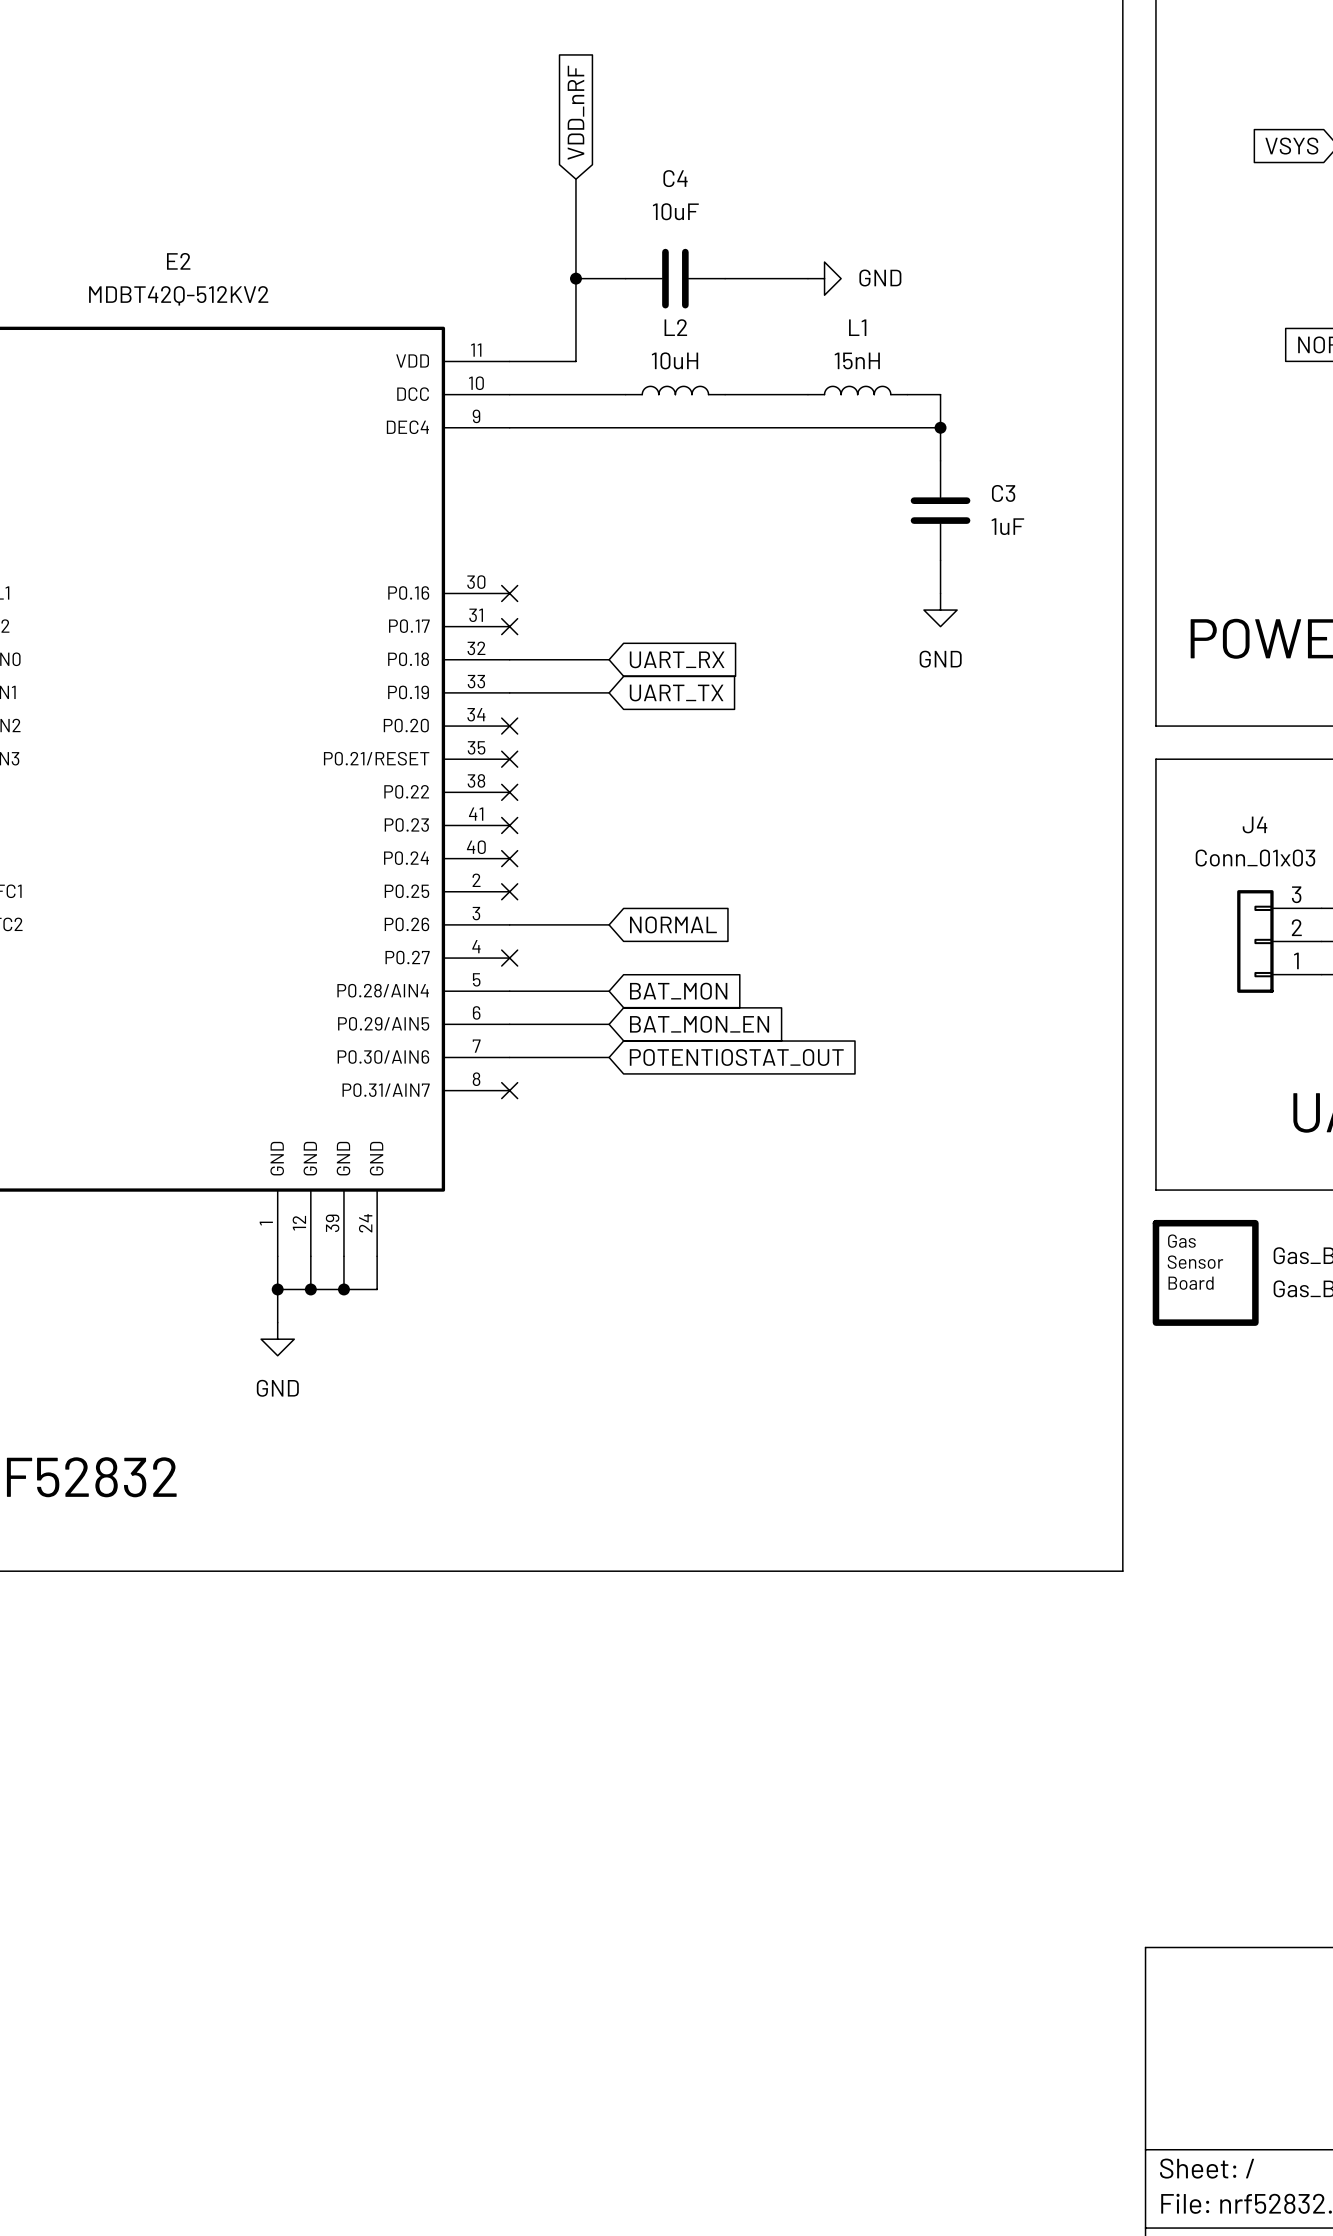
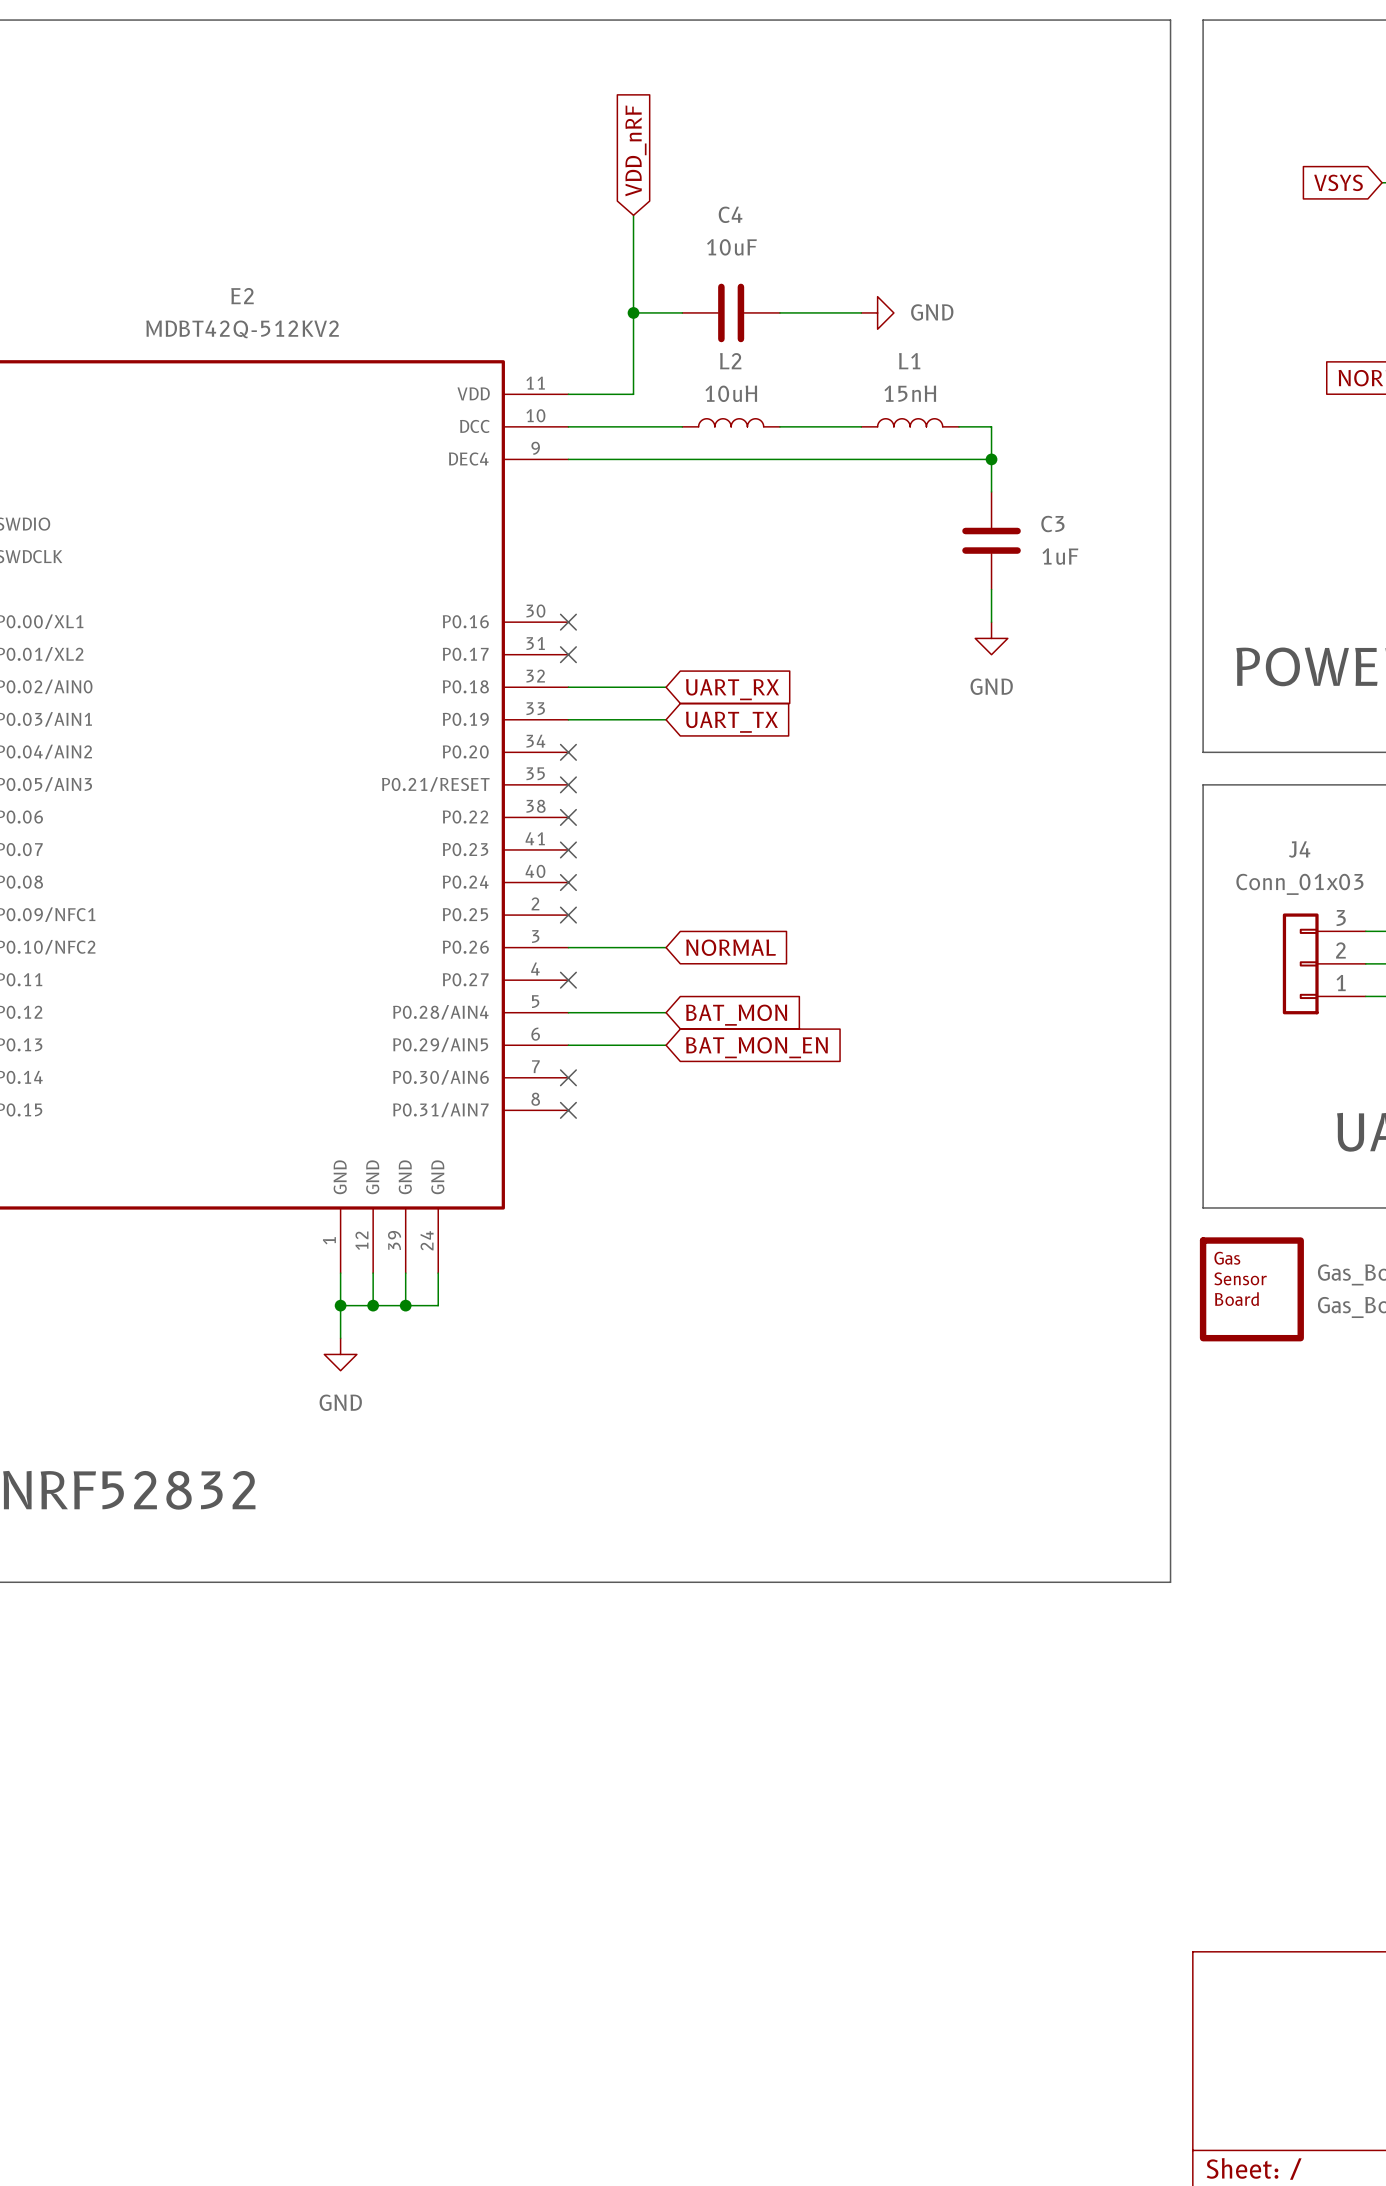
wire: (509, 1057) (609, 1057) -> none
no-connect mark: none -> (568, 1077)
global label: POTENTIOSTAT_OUT (736, 1057) -> none

